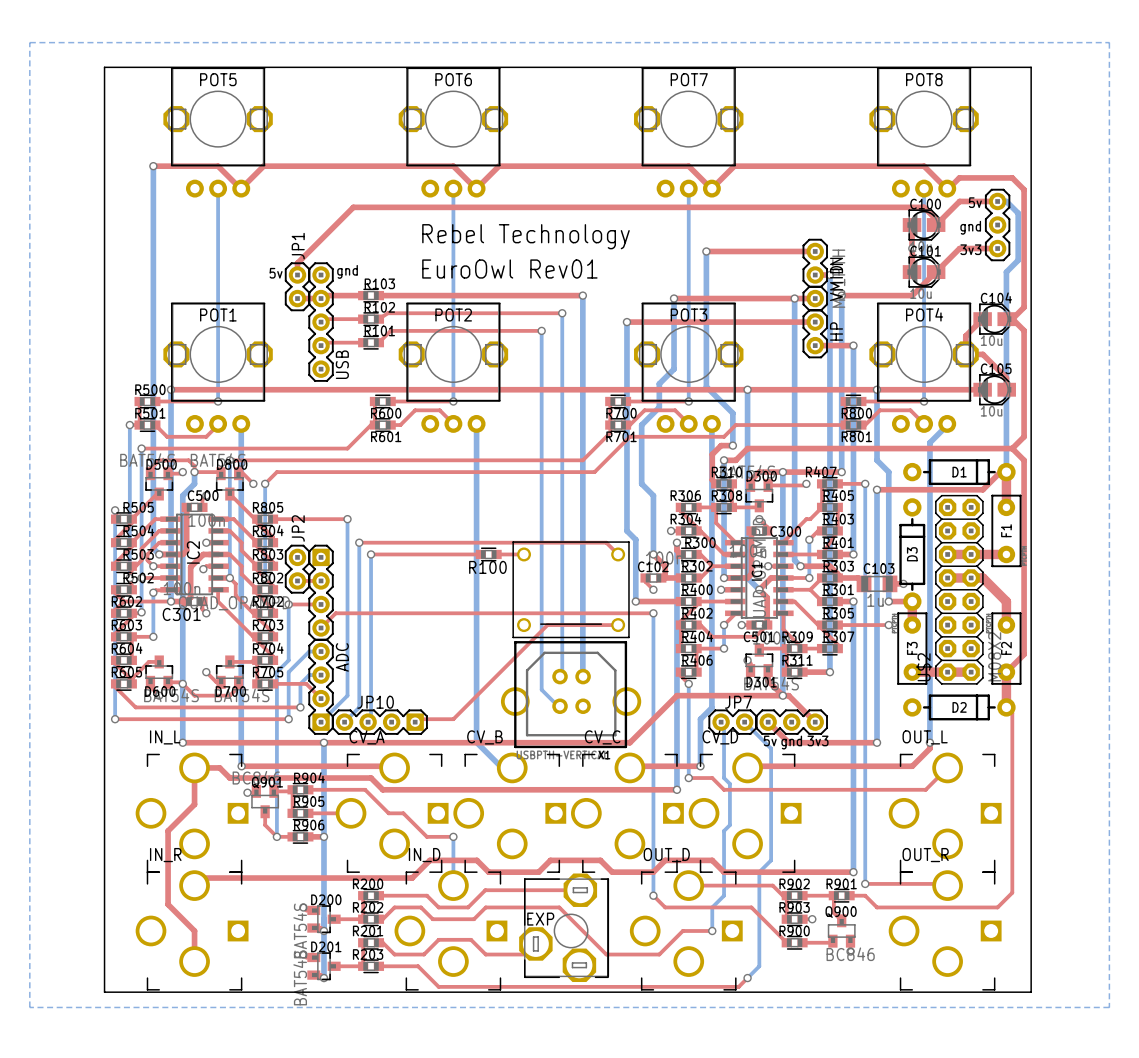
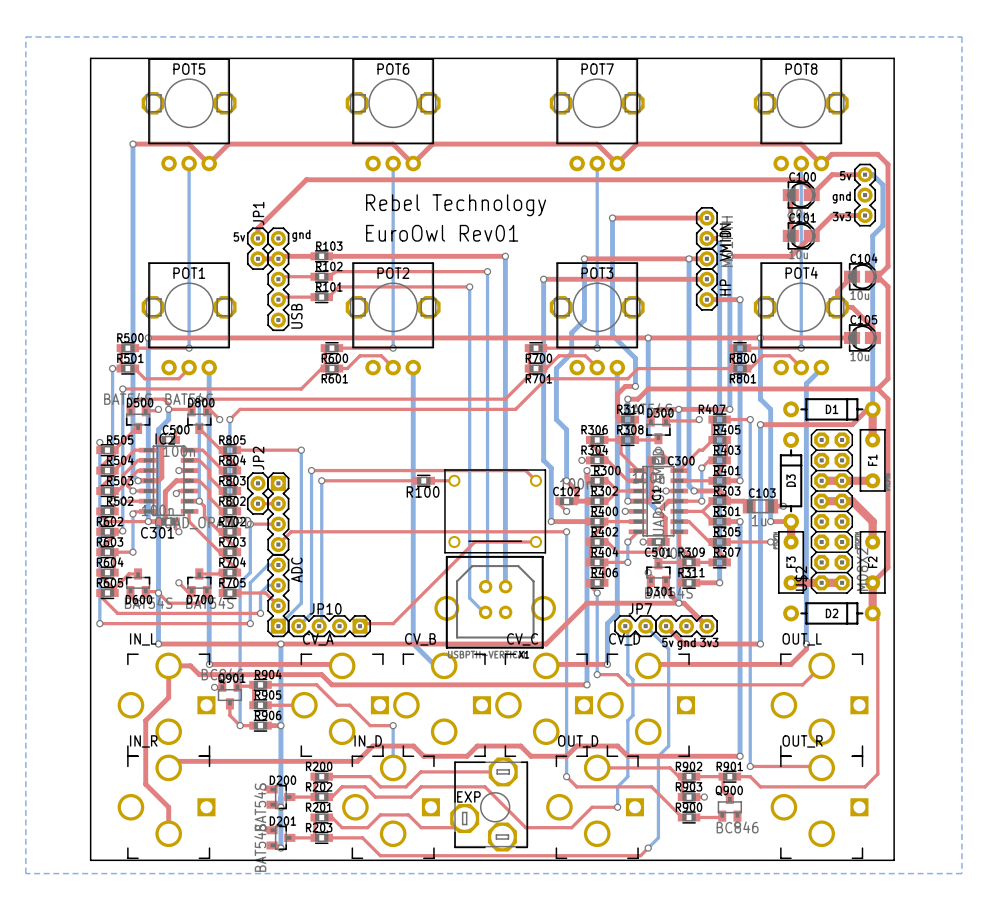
IC2 name rotation: 0° (193, 552) -> 90° clockwise (165, 438)
IC2 name position: IC2 (193, 552) -> IC2 (165, 438)

